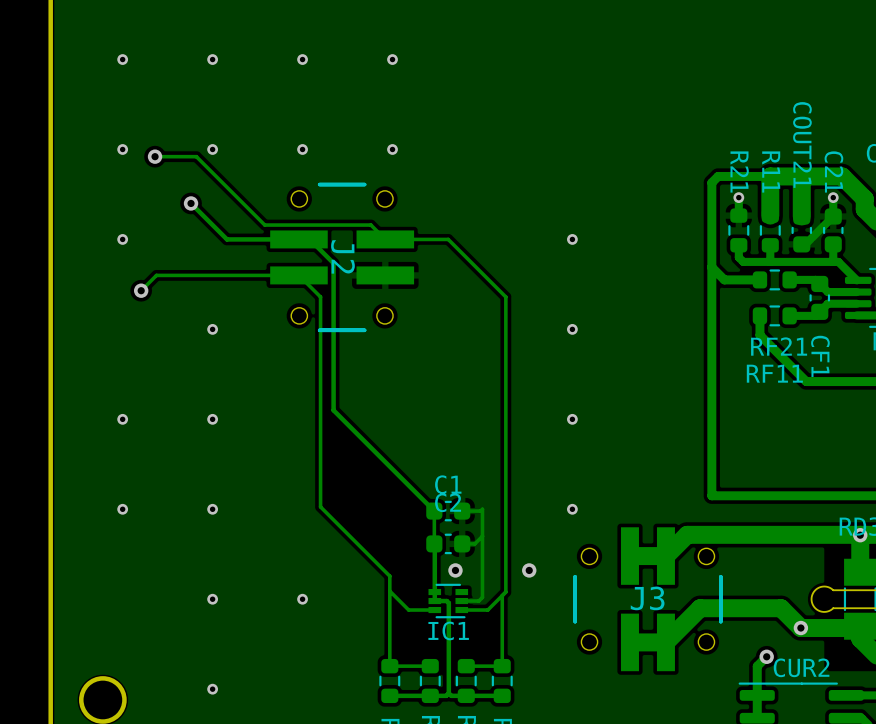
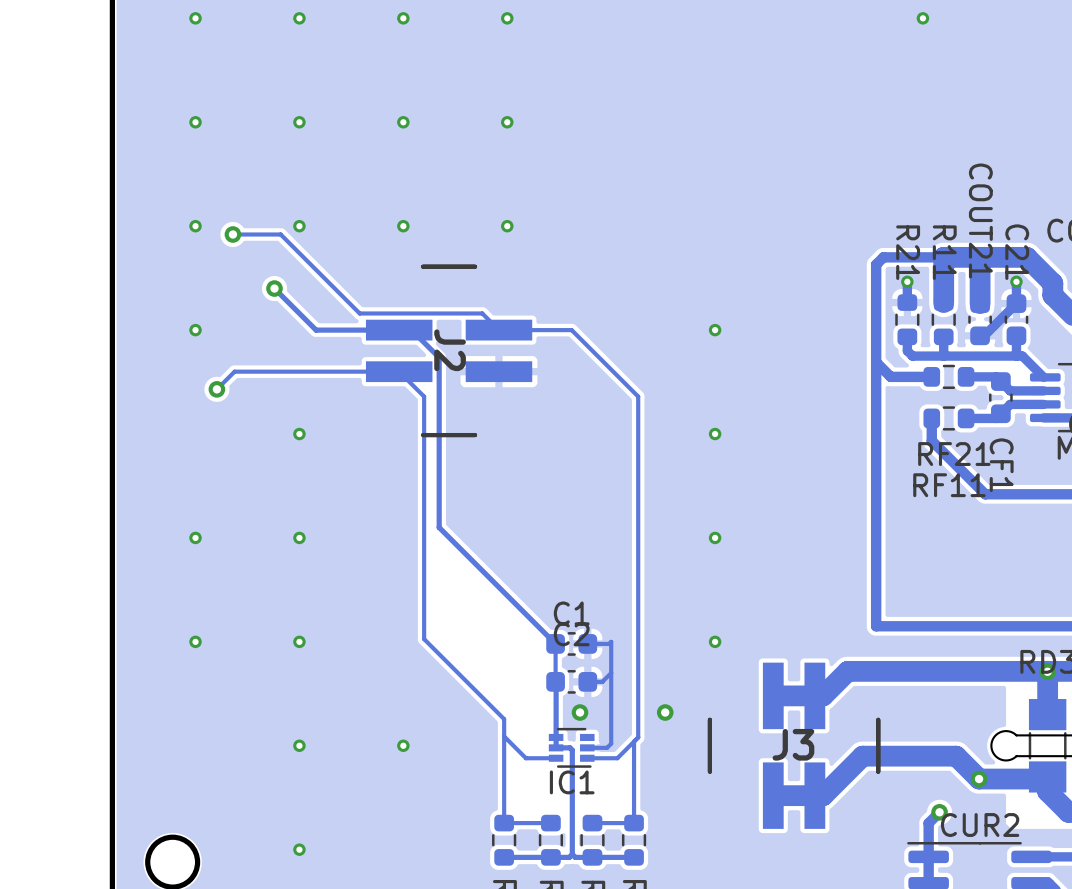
J2 footprint: [270, 182, 415, 333] -> [365, 264, 533, 438]
J3 footprint: [573, 527, 723, 672] -> [707, 662, 881, 829]

